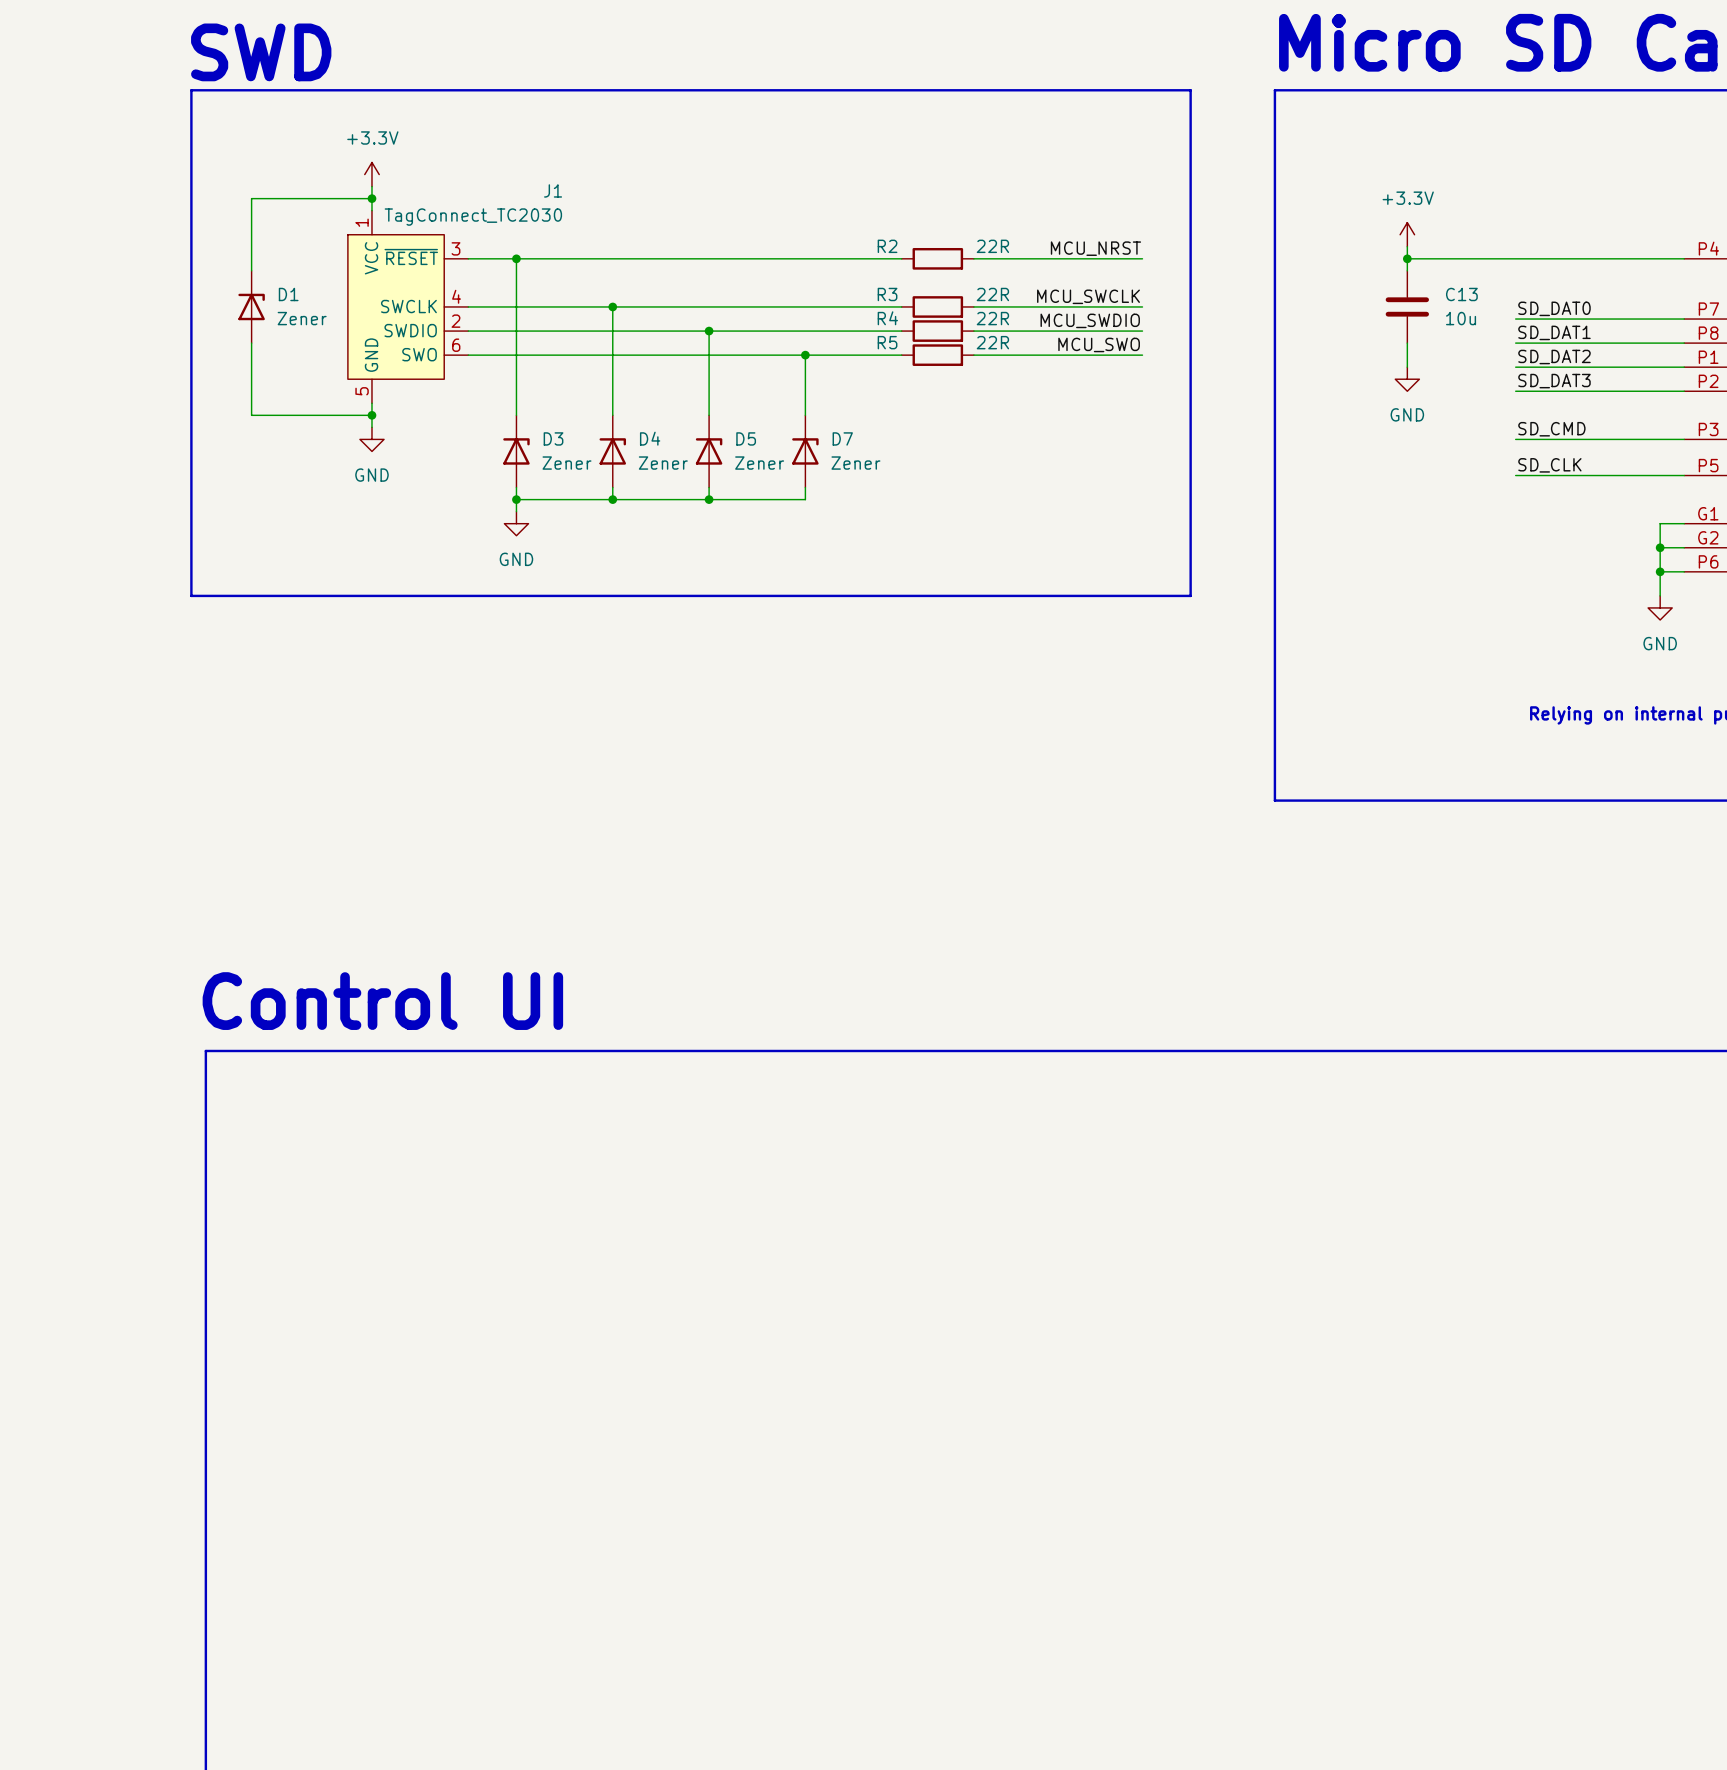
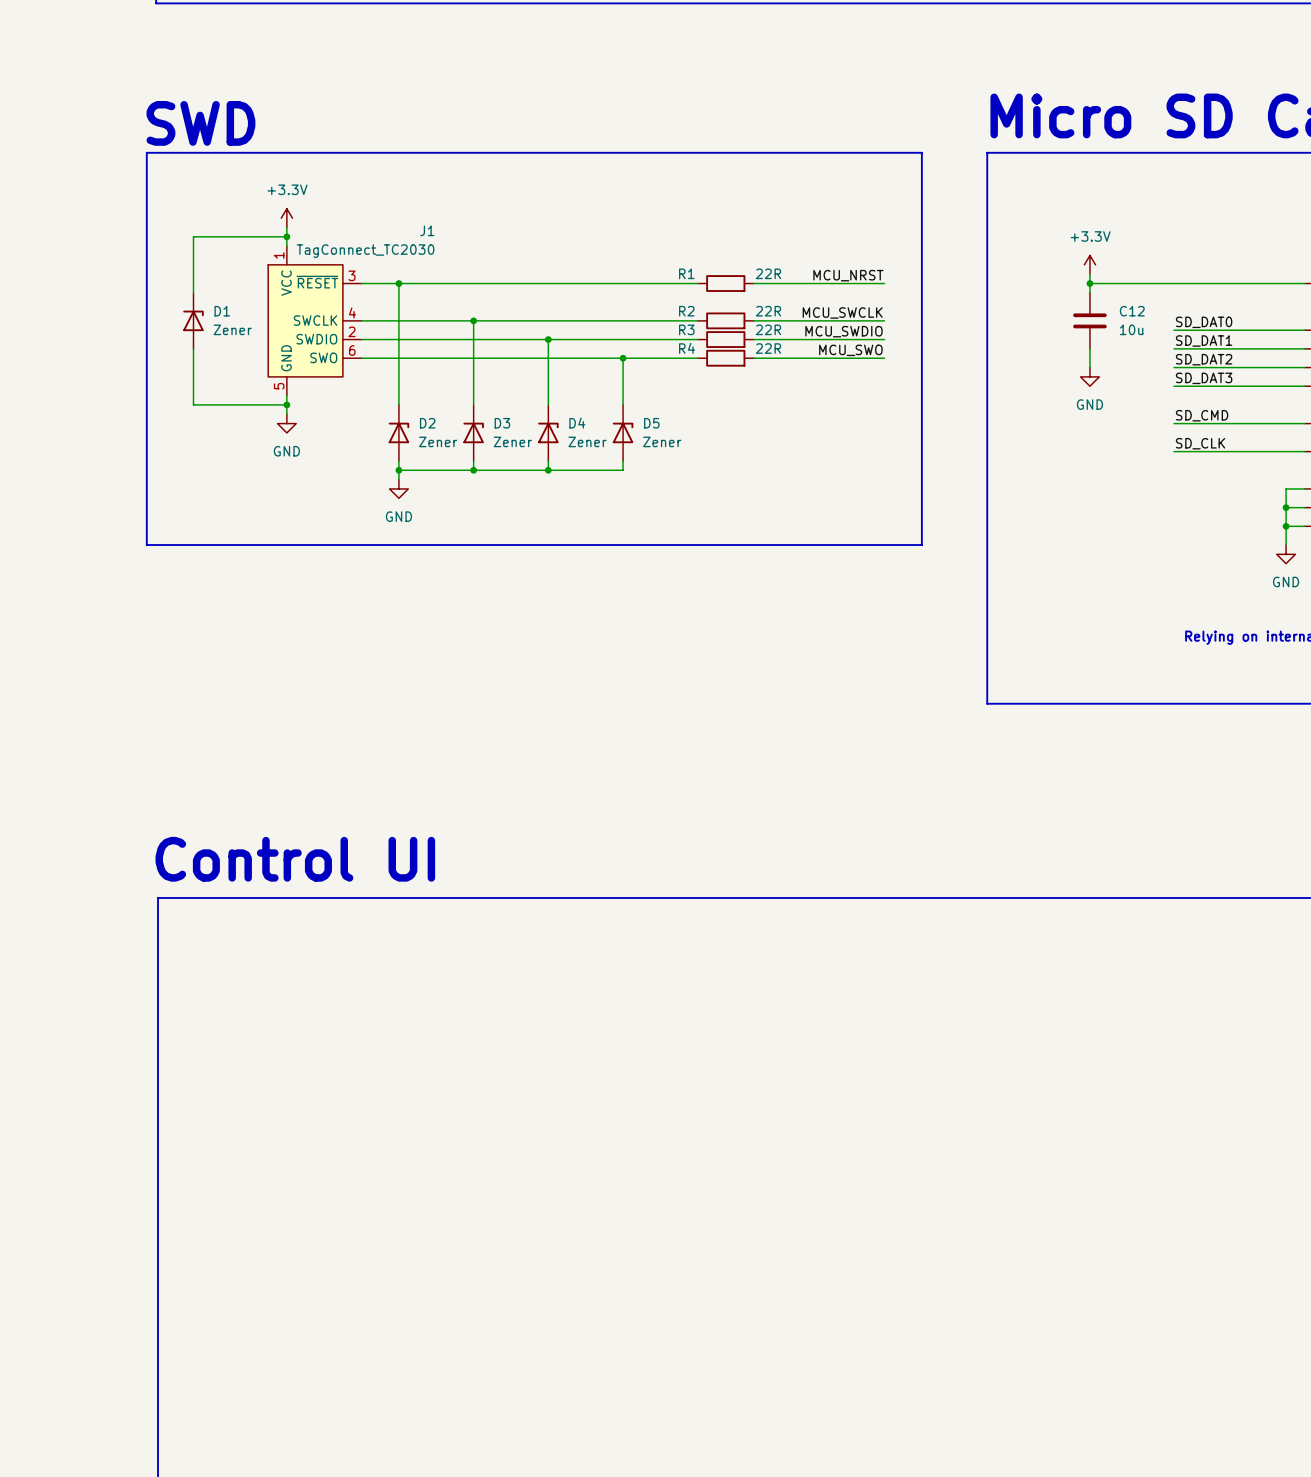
R2 name: R2 (887, 246) -> R1 (686, 273)
R3 name: R3 (887, 294) -> R2 (686, 311)
C13 name: C13 (1461, 294) -> C12 (1132, 311)
R4 name: R4 (887, 318) -> R3 (686, 329)
R5 name: R5 (887, 342) -> R4 (687, 348)
D3 name: D3 (553, 438) -> D2 (427, 423)
D4 name: D4 (650, 438) -> D3 (502, 423)
D5 name: D5 (746, 438) -> D4 (577, 423)
D7 name: D7 (842, 438) -> D5 (651, 423)

